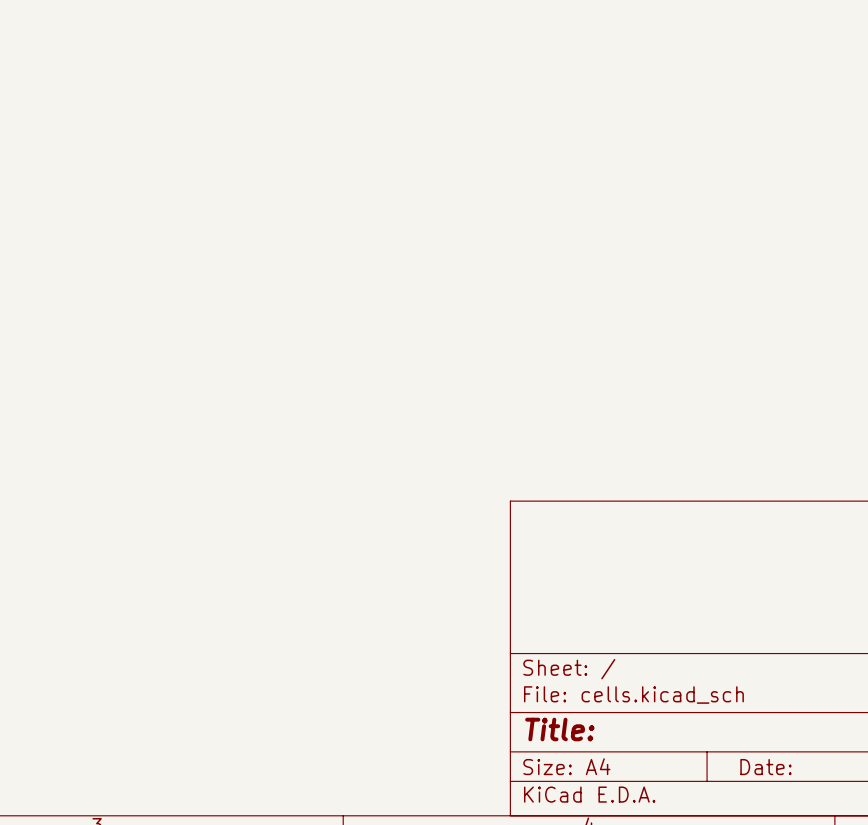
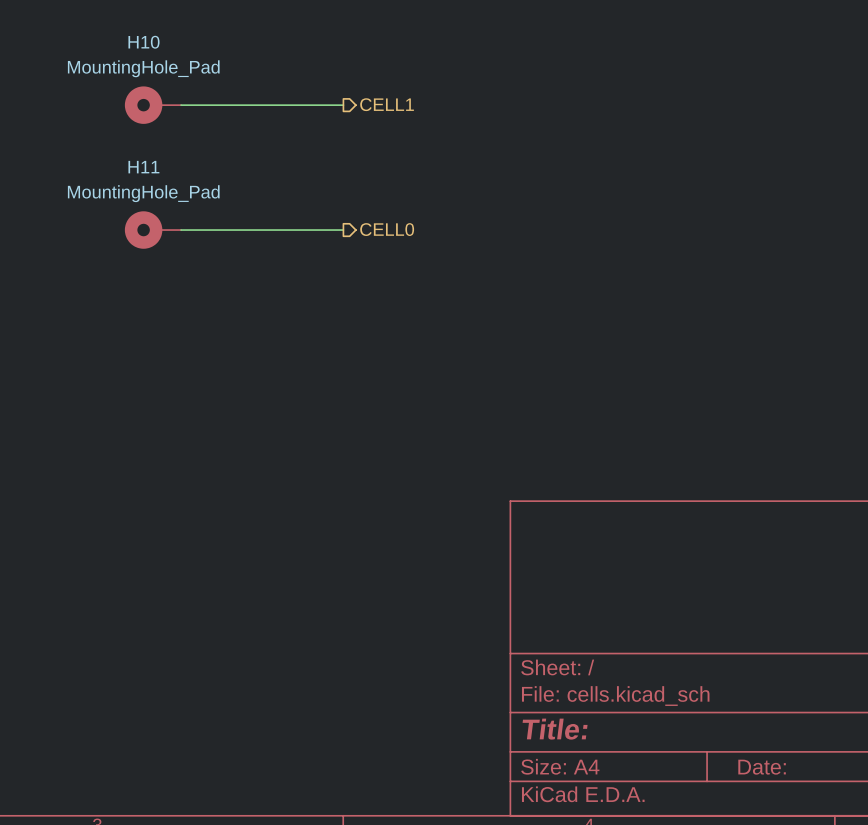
hierarchical label: none -> CELL1 (387, 104)
H10: none -> MountingHole_Pad (152, 105)
wire: none -> (181, 105) (343, 105)
hierarchical label: none -> CELL0 (387, 229)
H11: none -> MountingHole_Pad (152, 230)
wire: none -> (181, 230) (343, 230)

